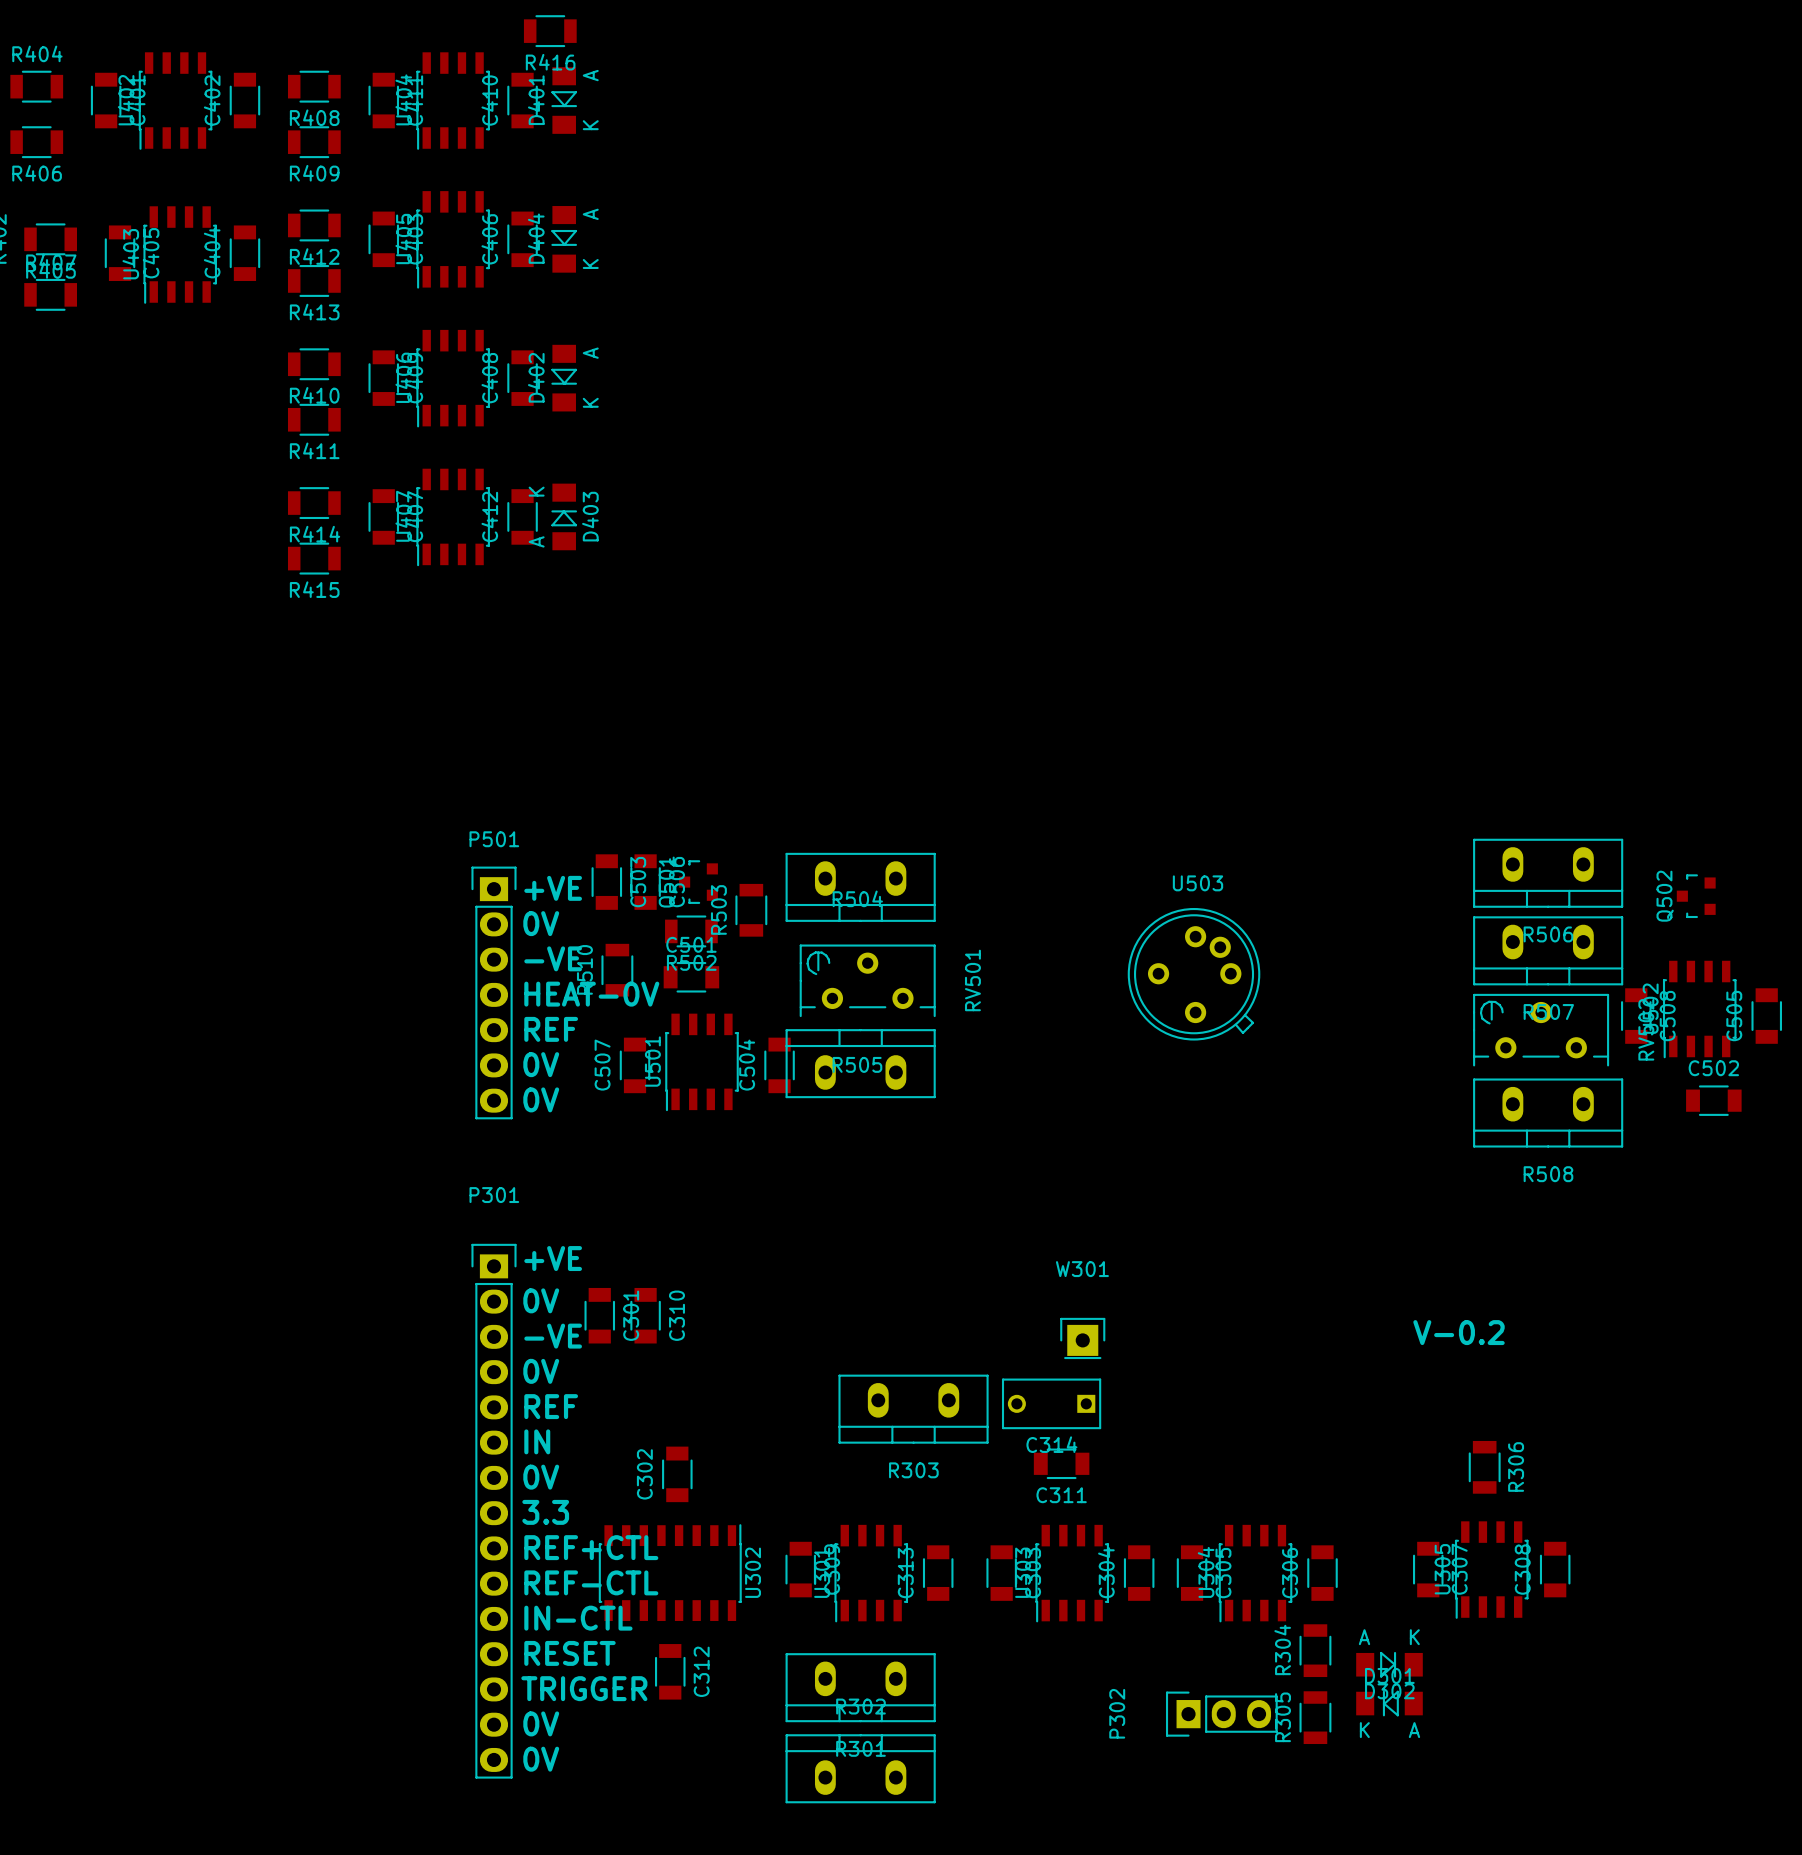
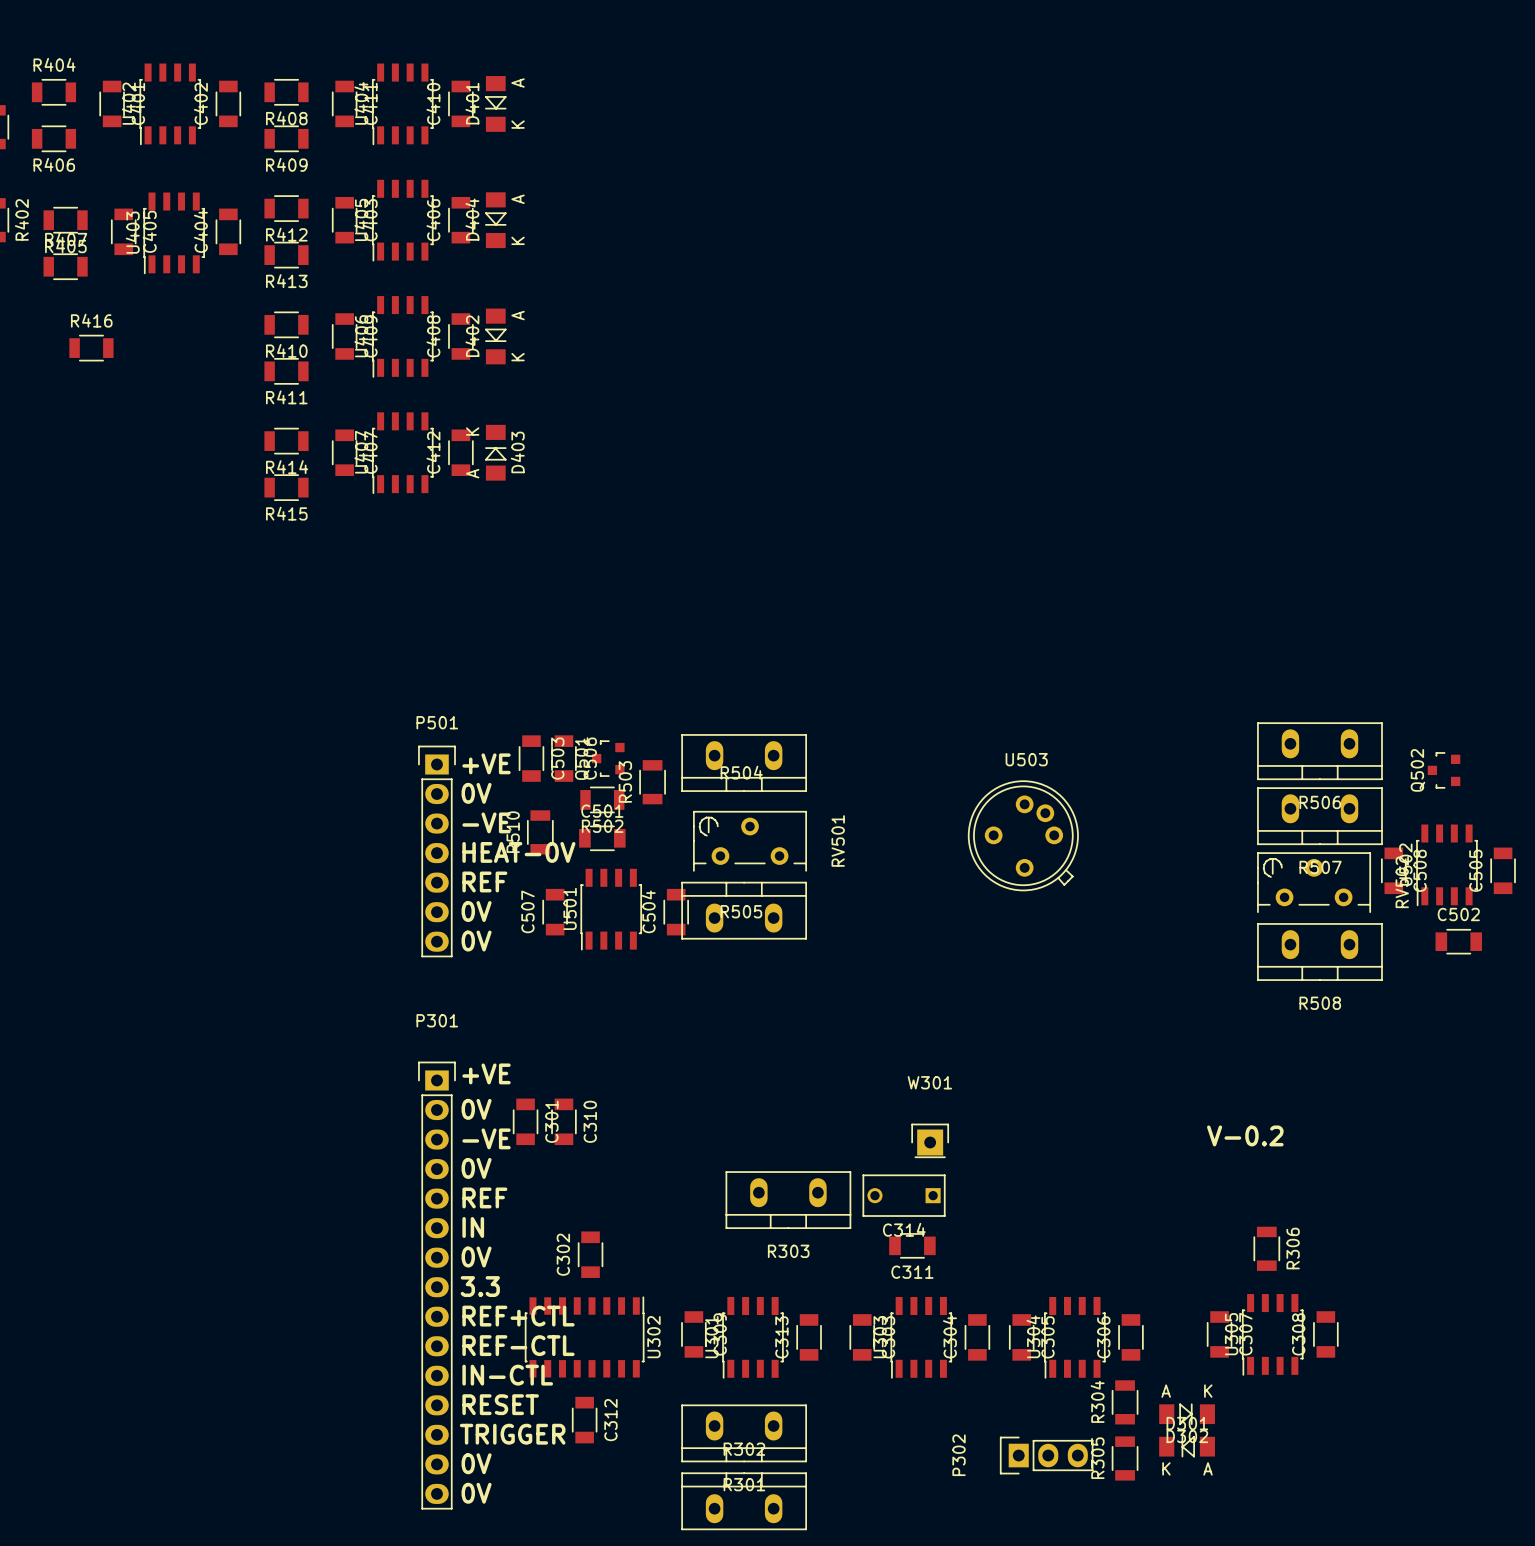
R416 position: (550, 31) -> (91, 348)
R416 name position: R416 (550, 62) -> R416 (91, 320)

